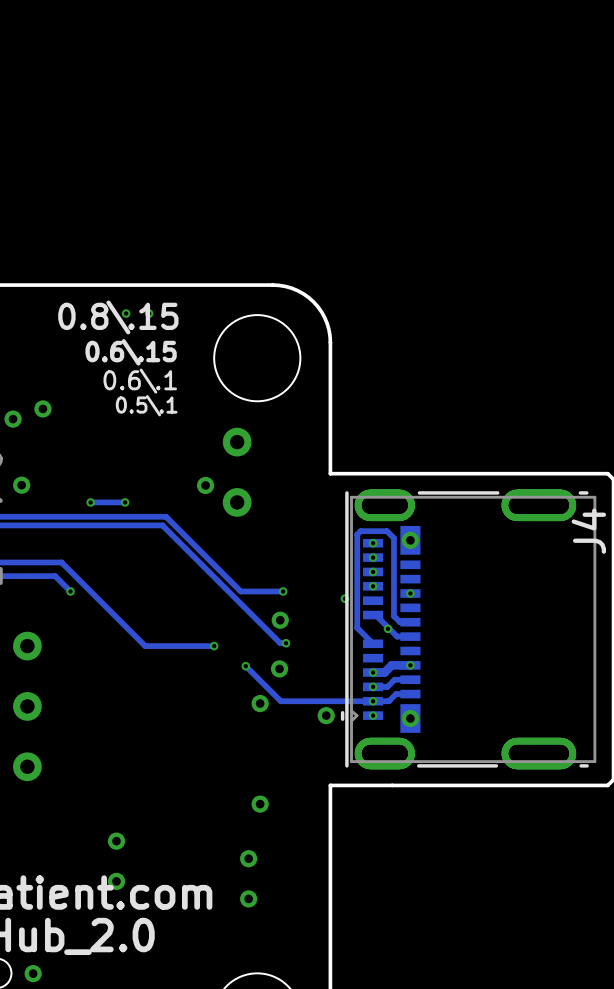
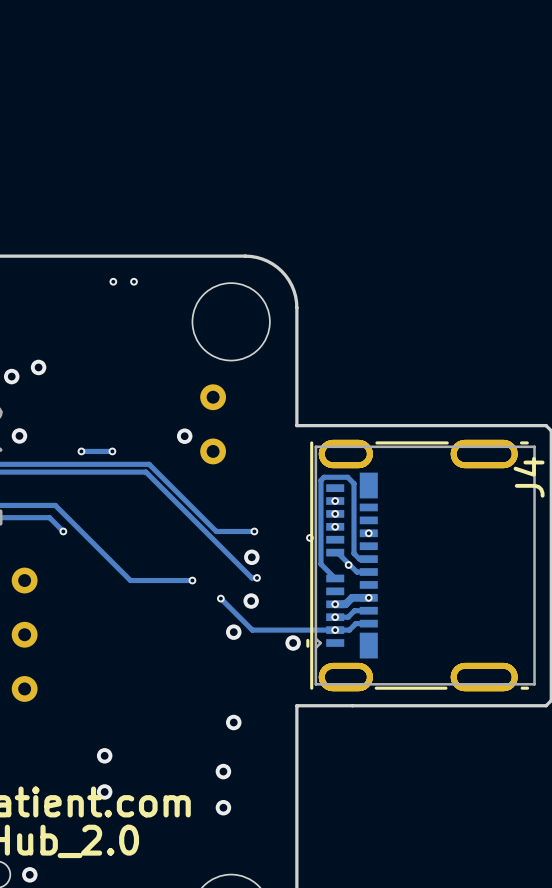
text: 0.8\.15 (118, 317) -> none
text: 0.6\.15 (131, 352) -> none
text: 0.6\.1 (140, 381) -> none
text: 0.5\.1 (146, 405) -> none
via: (410, 540) -> none
via: (373, 543) -> none
via: (373, 715) -> none
via: (410, 718) -> none

